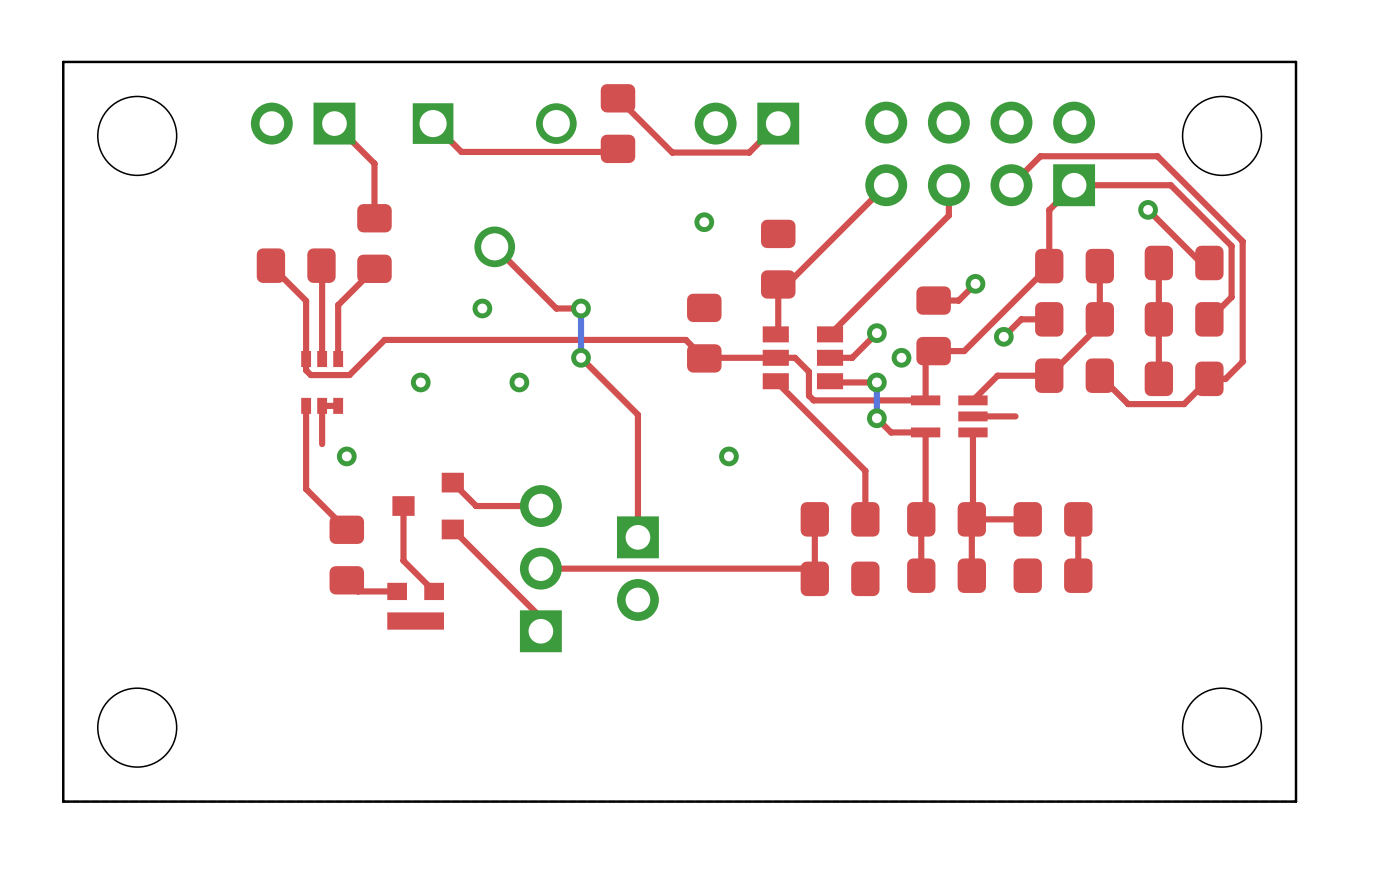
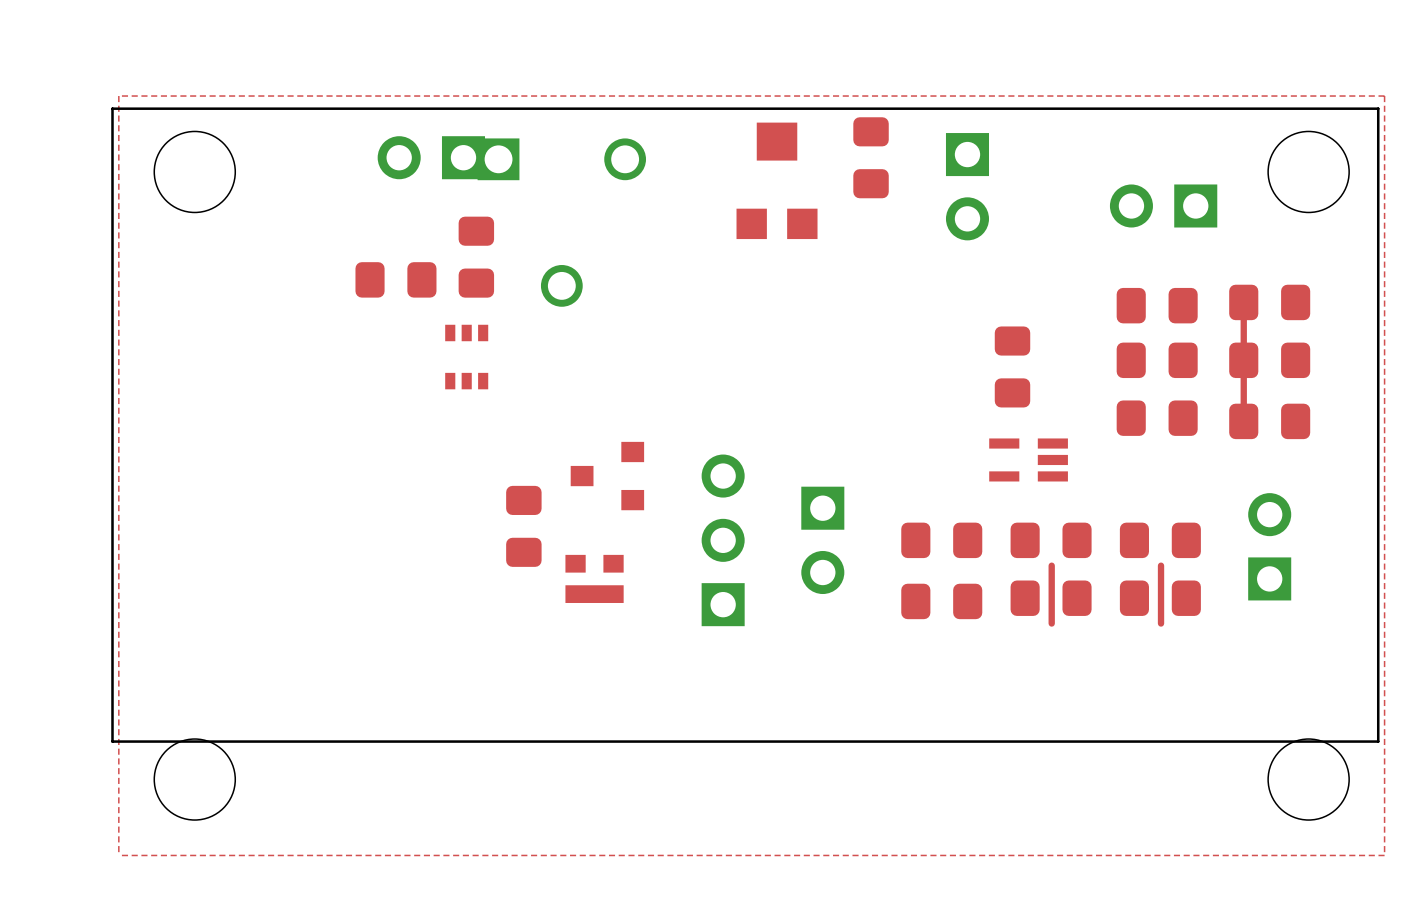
board edge: (1296, 61) (63, 61) (63, 801) (1296, 801) (1296, 61) -> (1378, 108) (1378, 741) (112, 741) (112, 108) (1378, 108)
top track: (617, 98) (672, 152) (749, 152) (778, 123) -> none
part: none -> (871, 157)
part position: (303, 123) -> (431, 157)
top track: (334, 123) (374, 163) (374, 218) -> none
top track: (433, 123) (461, 151) (614, 151) (617, 148) -> none
part: (617, 123) -> none
part rotation: 0° (746, 123) -> 90° counterclockwise (967, 186)
part position: (746, 123) -> (967, 186)
part: none -> (777, 180)
part: (980, 153) -> none
part: none -> (1163, 205)
top track: (886, 185) (787, 284) (778, 284) (778, 331) (775, 334) -> none
top track: (948, 185) (948, 215) (830, 334) -> none
top track: (1011, 185) (1040, 156) (1157, 156) (1242, 241) (1242, 361) (1225, 378) (1209, 378) (1184, 404) (1128, 404) (1099, 375) -> none
top track: (1148, 209) (1201, 262) (1209, 262) -> none
via: (1148, 209) -> none
part: none -> (476, 257)
via: (704, 222) -> none
part: none -> (395, 279)
part: (374, 243) -> none
top track: (494, 246) (556, 308) (581, 308) -> none
part: (778, 259) -> none
top track: (270, 265) (306, 300) (306, 370) (310, 375) (349, 375) (384, 339) (685, 339) (704, 358) (795, 357) (808, 371) (808, 395) (813, 400) (925, 400) (925, 359) (933, 351) (964, 351) (1049, 266) (1049, 210) (1074, 185) (1170, 185) (1231, 246) (1231, 297) (1209, 319) -> none
part: (296, 265) -> none
top track: (324, 265) (321, 265) (322, 359) -> none
top track: (1099, 266) (1099, 325) (1049, 375) (997, 375) (972, 400) -> none
top track: (381, 275) (374, 268) (338, 305) (338, 359) -> none
top track: (975, 283) (958, 300) (933, 300) -> none
via: (975, 283) -> none
via: (482, 308) -> none
bottom track: (581, 308) (581, 357) -> none
via: (581, 308) -> none
top track: (1049, 319) (1021, 319) (1003, 336) -> none
part: (704, 333) -> none
top track: (876, 333) (852, 357) (830, 357) -> none
via: (876, 333) -> none
via: (1003, 336) -> none
top track: (581, 357) (637, 414) (637, 537) -> none
via: (581, 357) -> none
part: (802, 357) -> none
via: (901, 357) -> none
top track: (775, 381) (865, 470) (865, 519) -> none
top track: (830, 381) (876, 382) -> none
part position: (322, 382) -> (466, 357)
via: (420, 382) -> none
via: (519, 382) -> none
bottom track: (876, 382) (876, 418) -> none
via: (876, 382) -> none
top track: (306, 405) (306, 489) (346, 529) (349, 527) -> none
top track: (333, 405) (322, 405) (322, 444) -> none
top track: (1015, 416) (972, 416) -> none
top track: (876, 418) (891, 432) (925, 432) (925, 515) (921, 519) (921, 575) -> none
via: (876, 418) -> none
top track: (972, 432) (971, 519) (1027, 519) -> none
via: (346, 456) -> none
via: (728, 456) -> none
part: none -> (523, 526)
top track: (452, 482) (476, 506) (540, 506) -> none
part: none -> (941, 540)
part: none -> (1051, 540)
part: none -> (1160, 540)
part: none -> (1269, 546)
top track: (403, 506) (403, 560) (434, 591) -> none
part position: (428, 506) -> (607, 476)
top track: (814, 519) (814, 578) (804, 568) (540, 568) -> none
part: (840, 519) -> none
part: (946, 519) -> none
part: (1053, 519) -> none
top track: (452, 529) (540, 617) (540, 631) -> none
part: none -> (1051, 598)
part: none -> (1160, 598)
part: none -> (941, 601)
part: (346, 555) -> none
part position: (540, 568) -> (723, 540)
part position: (637, 568) -> (822, 540)
part: (946, 575) -> none
part: (1053, 575) -> none
part: (840, 578) -> none
top track: (346, 580) (357, 591) (397, 591) -> none
part position: (415, 606) -> (594, 578)

